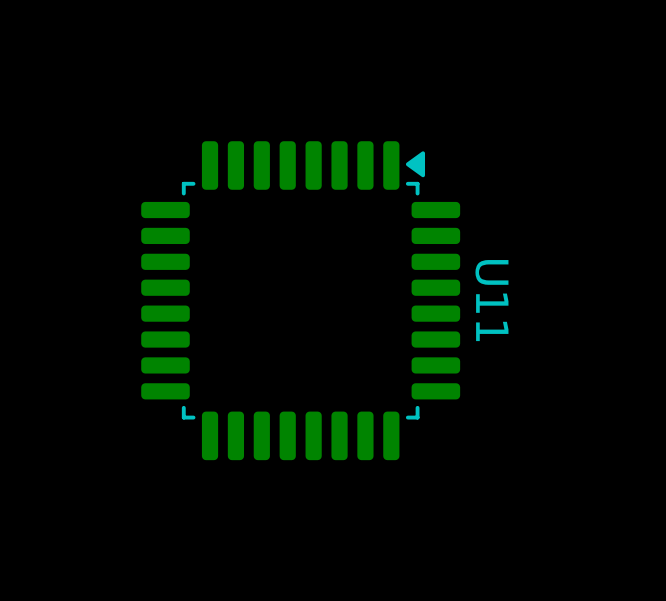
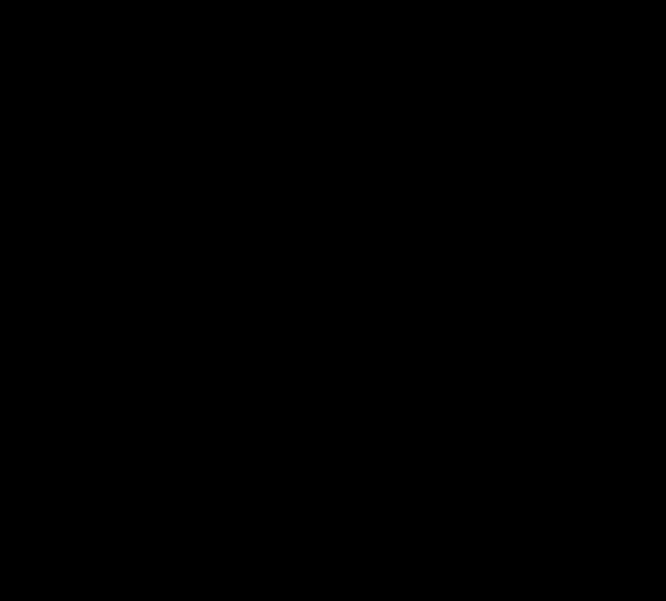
U11: (300, 300) -> none

